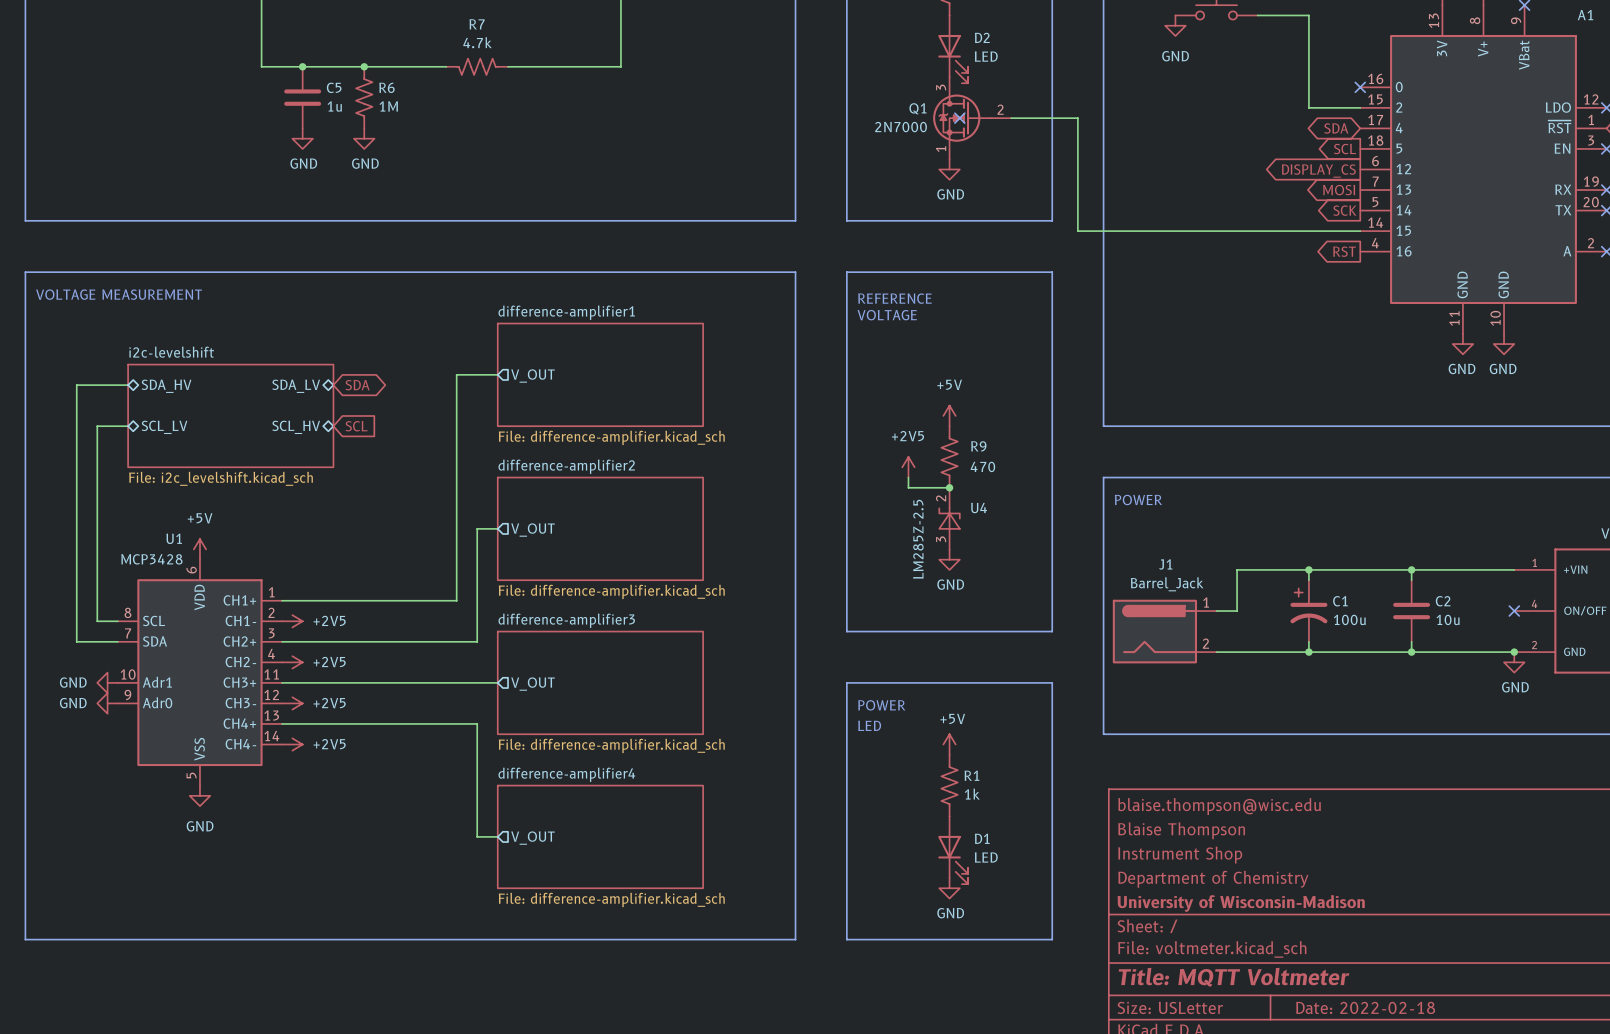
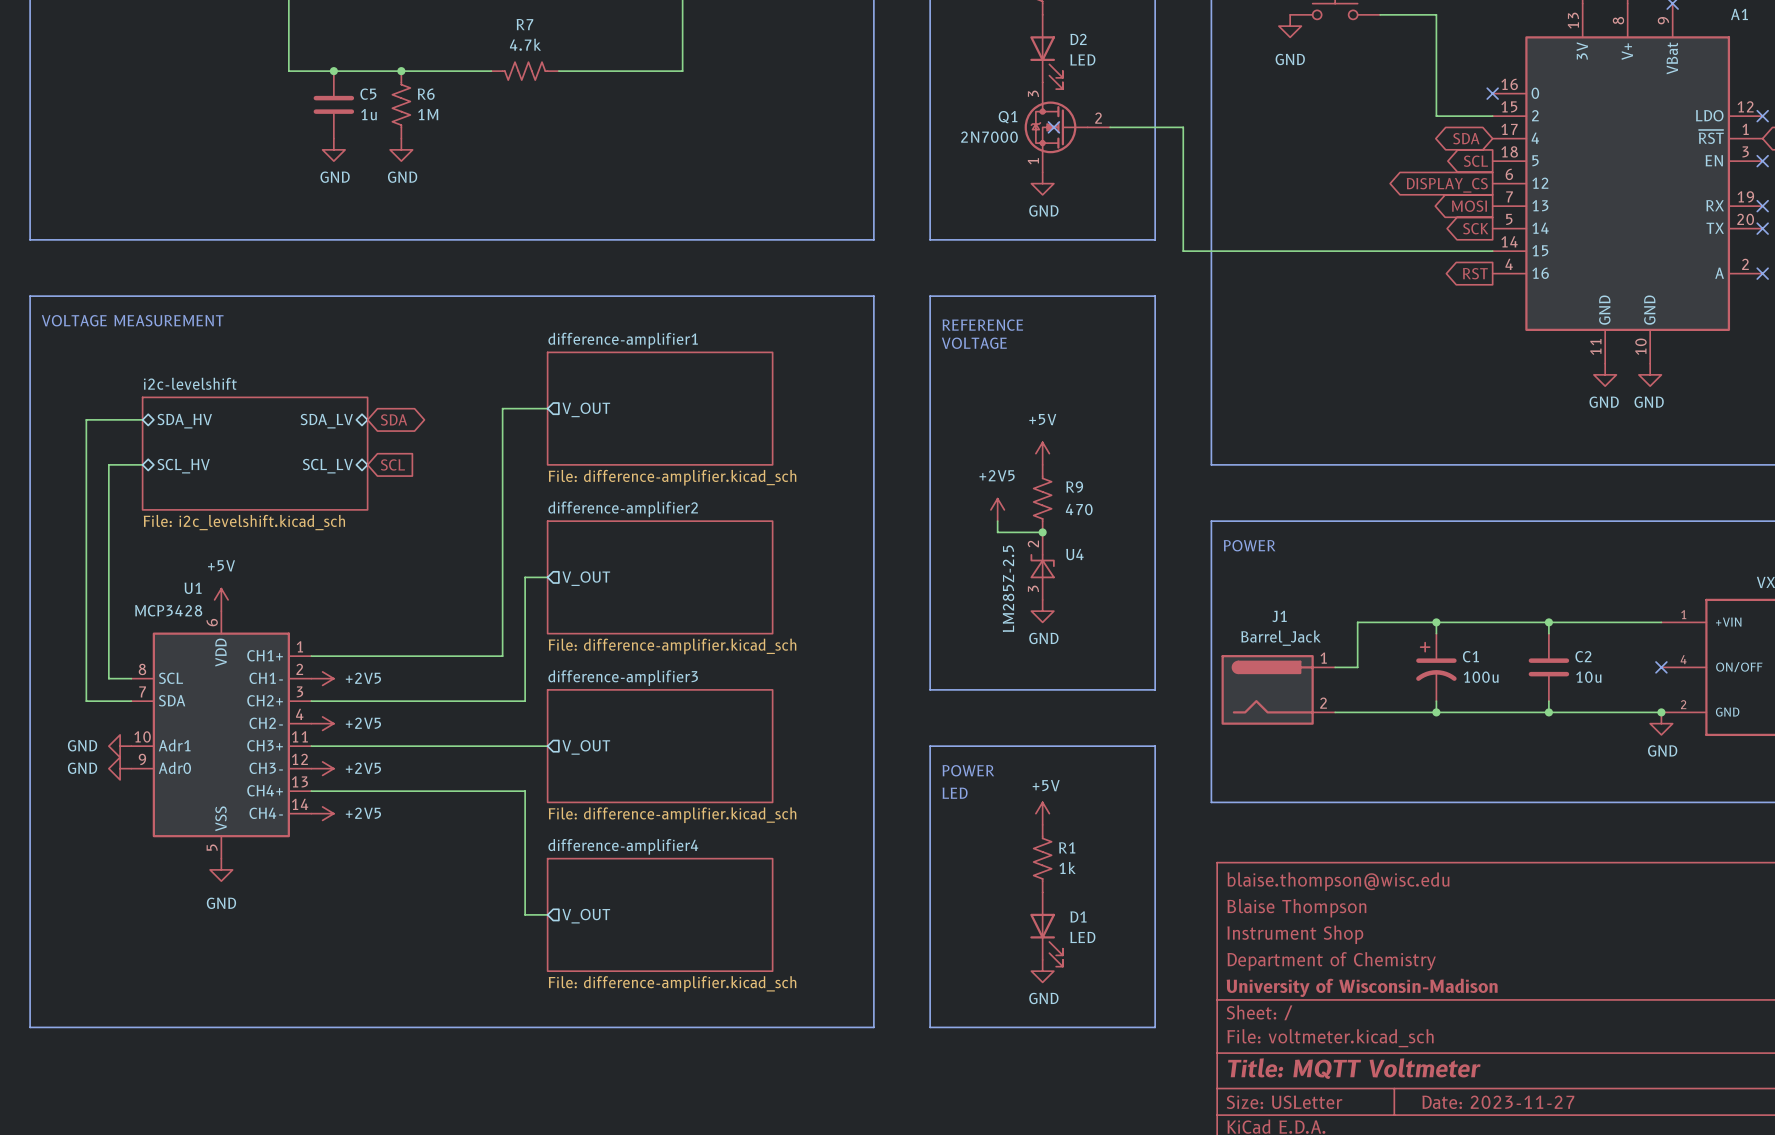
sheet pin: SCL_LV (164, 427) -> SCL_HV (183, 466)
sheet pin: SCL_HV (296, 427) -> SCL_LV (327, 466)
title block: Date: 2022-02-18 (1365, 1007) -> Date: 2023-11-27 (1498, 1102)

